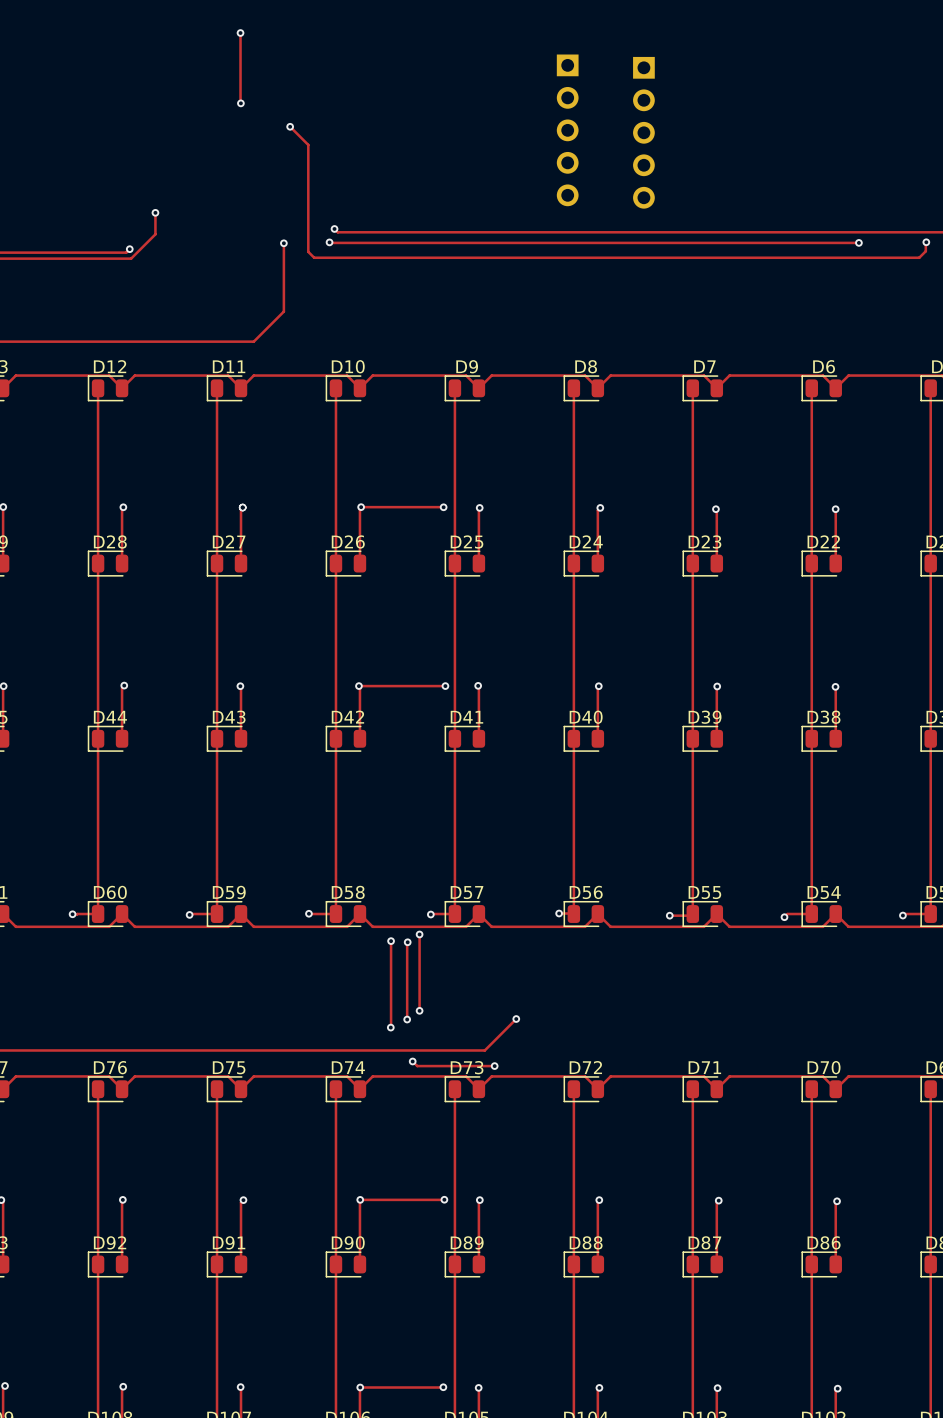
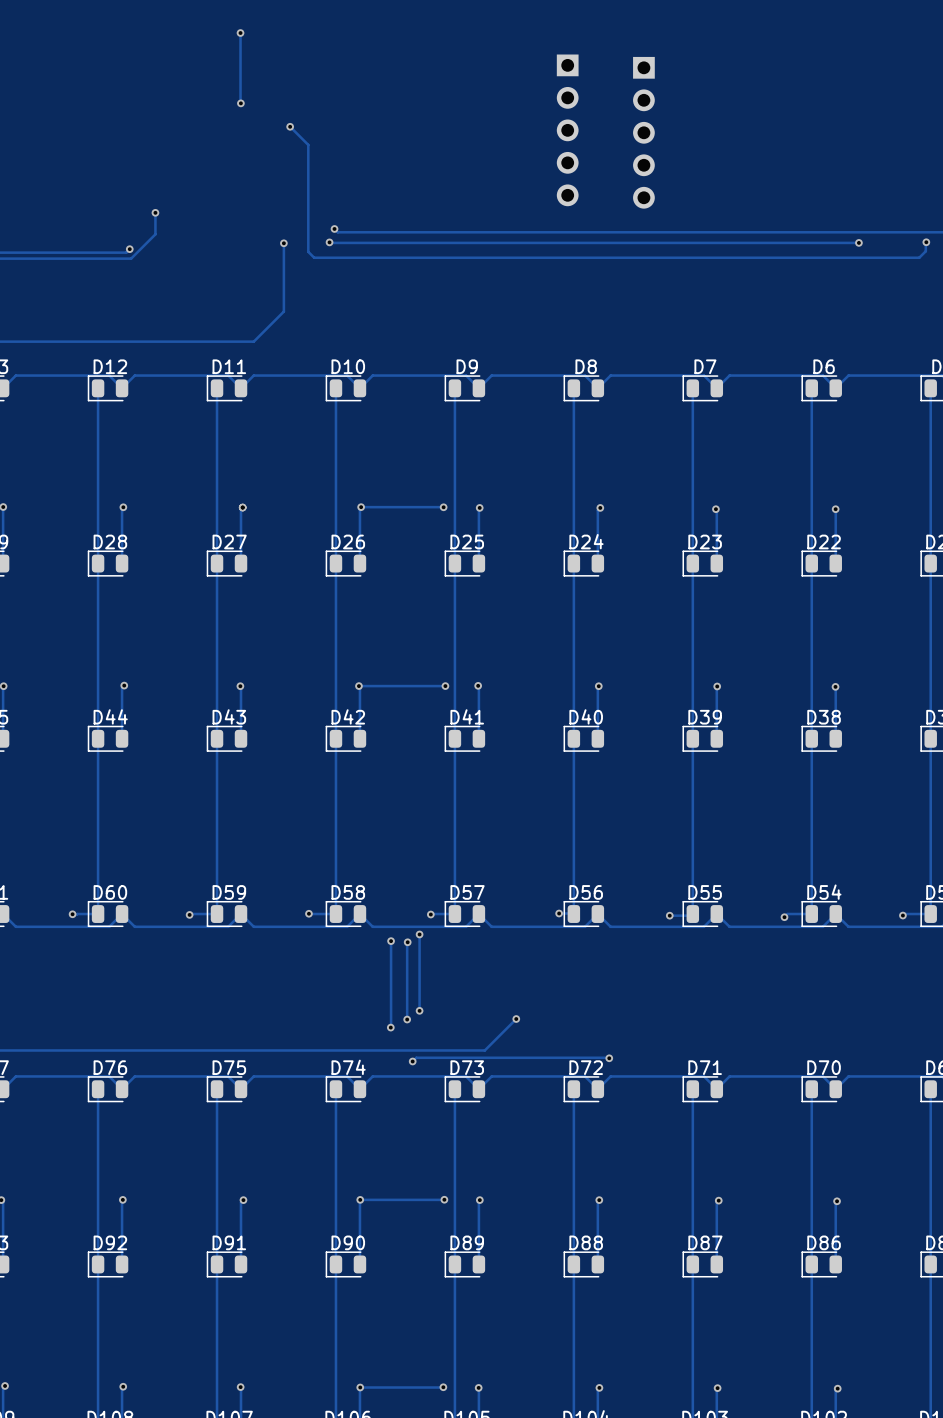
via: none -> (609, 1058)
track: (412, 1061) (417, 1066) (494, 1066) -> (412, 1061) (416, 1057) (609, 1058)
via: (494, 1066) -> none

